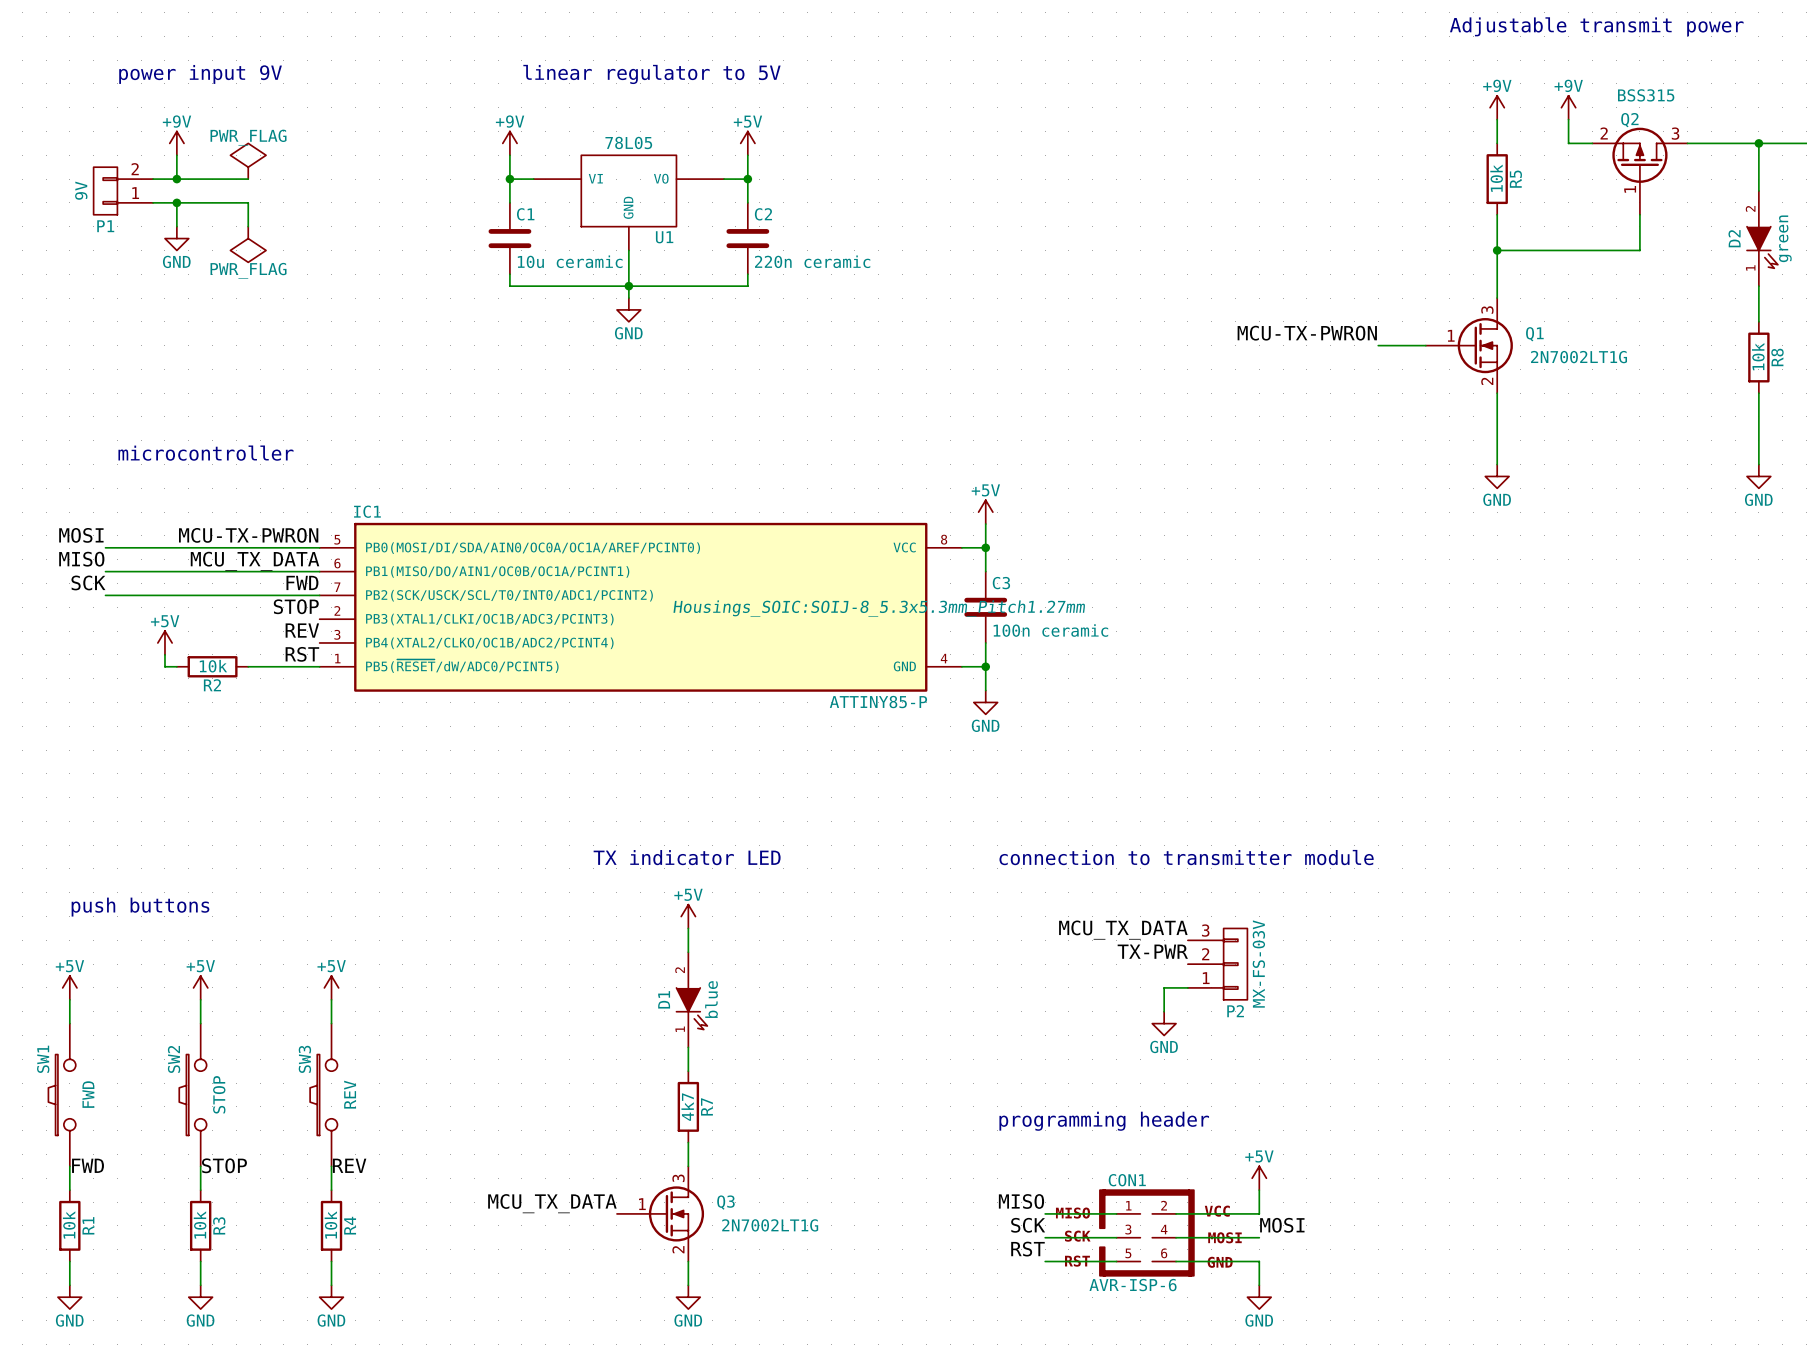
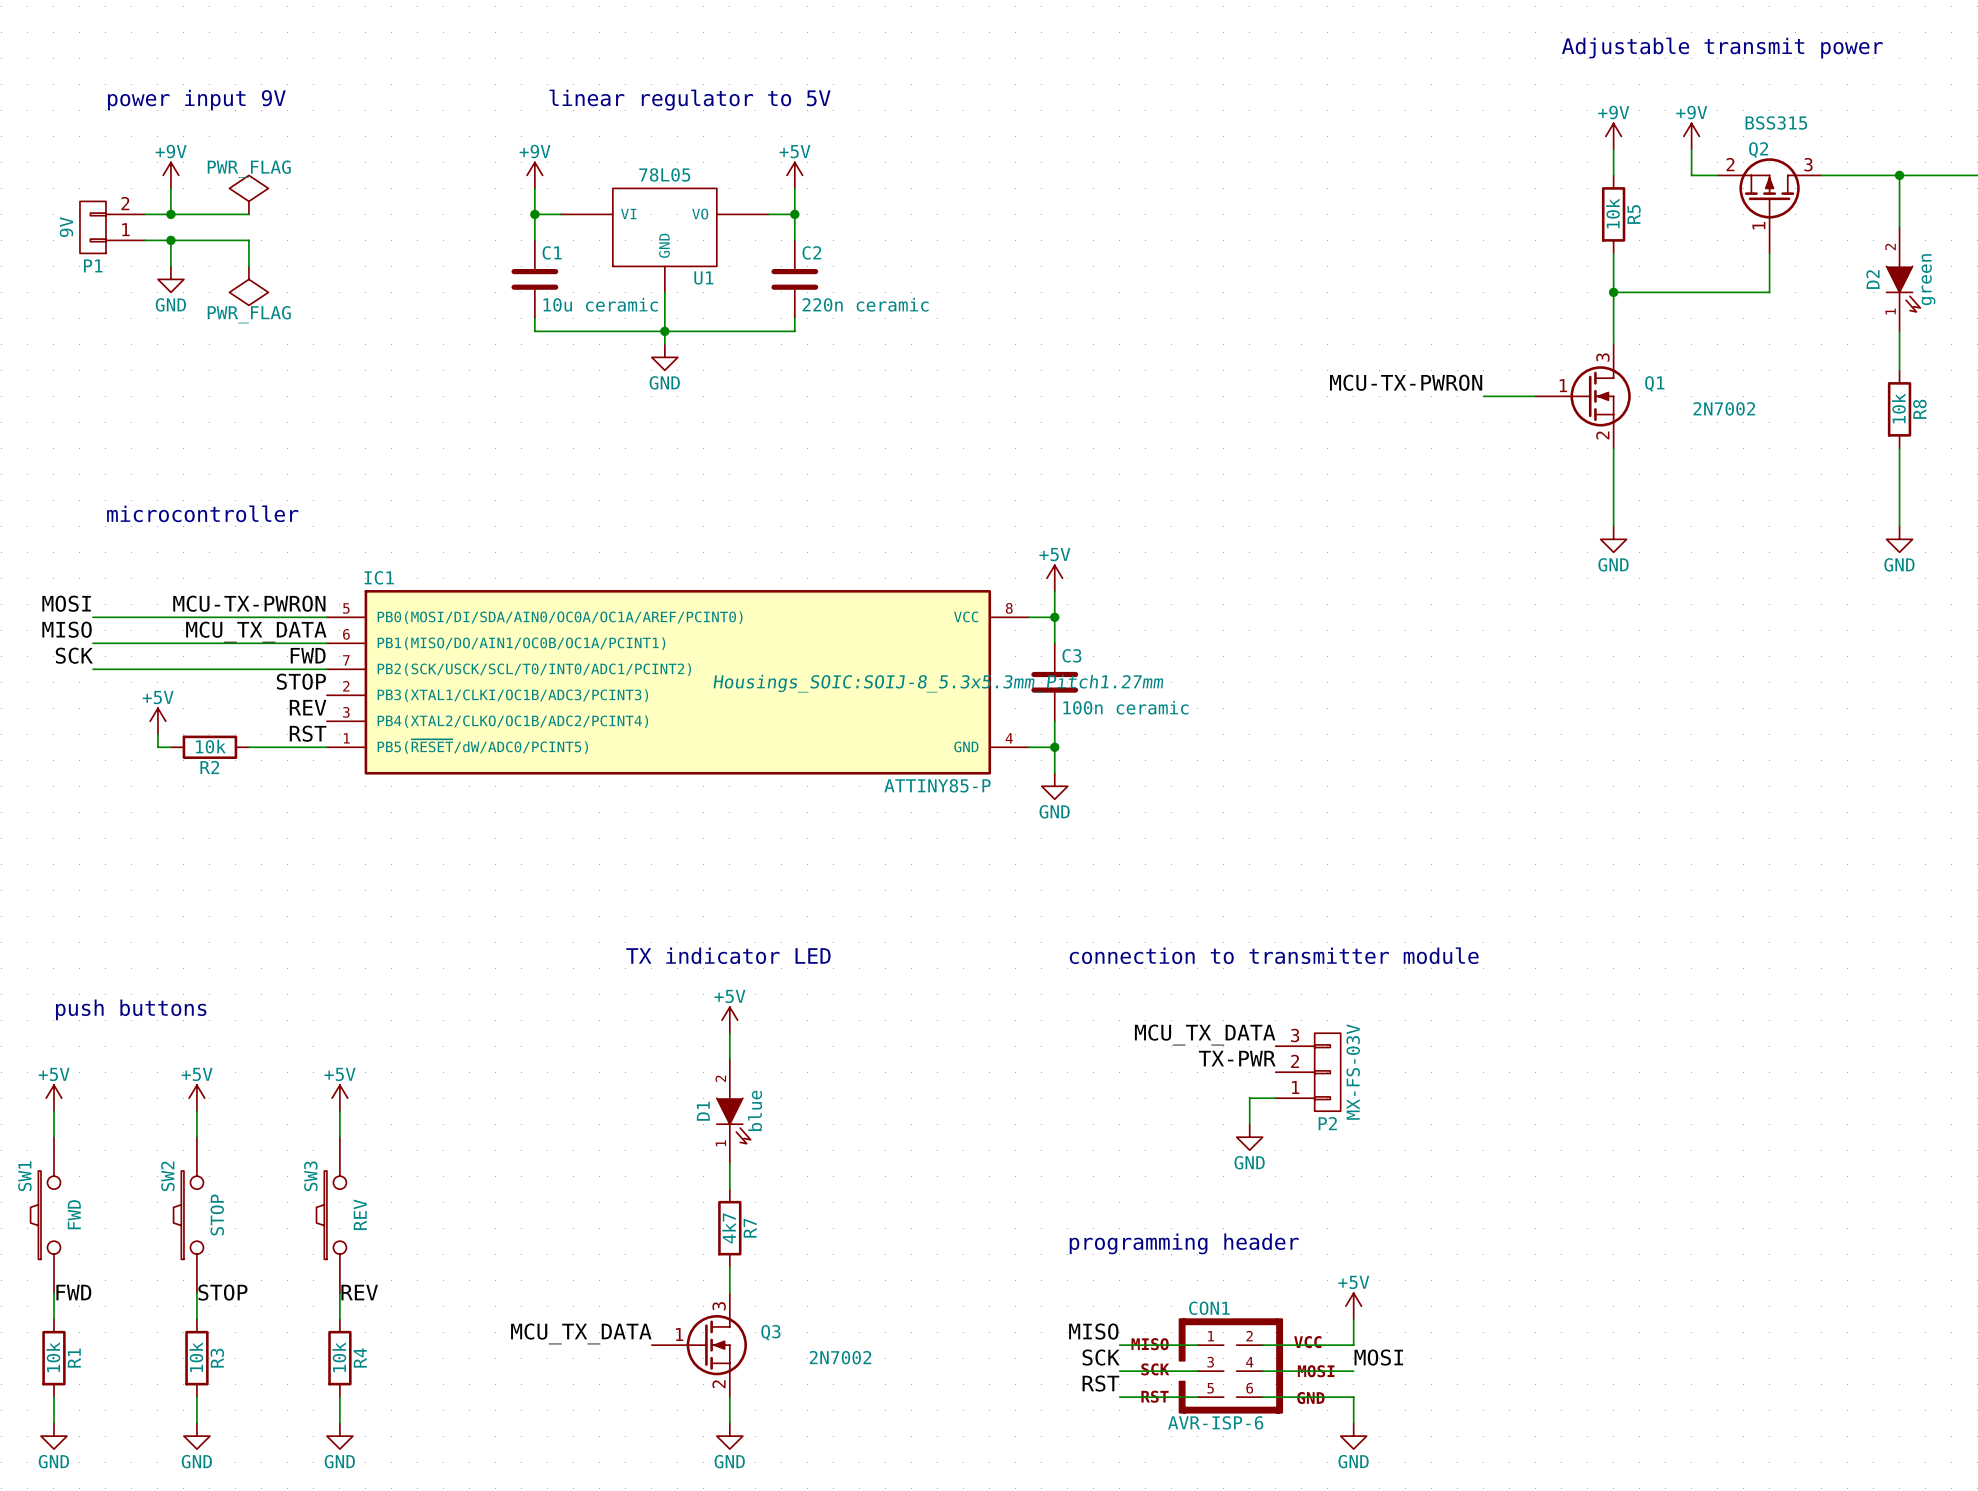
Q1 value: 2N7002LT1G (1579, 357) -> 2N7002 (1724, 408)
Q3 value: 2N7002LT1G (770, 1225) -> 2N7002 (840, 1357)

